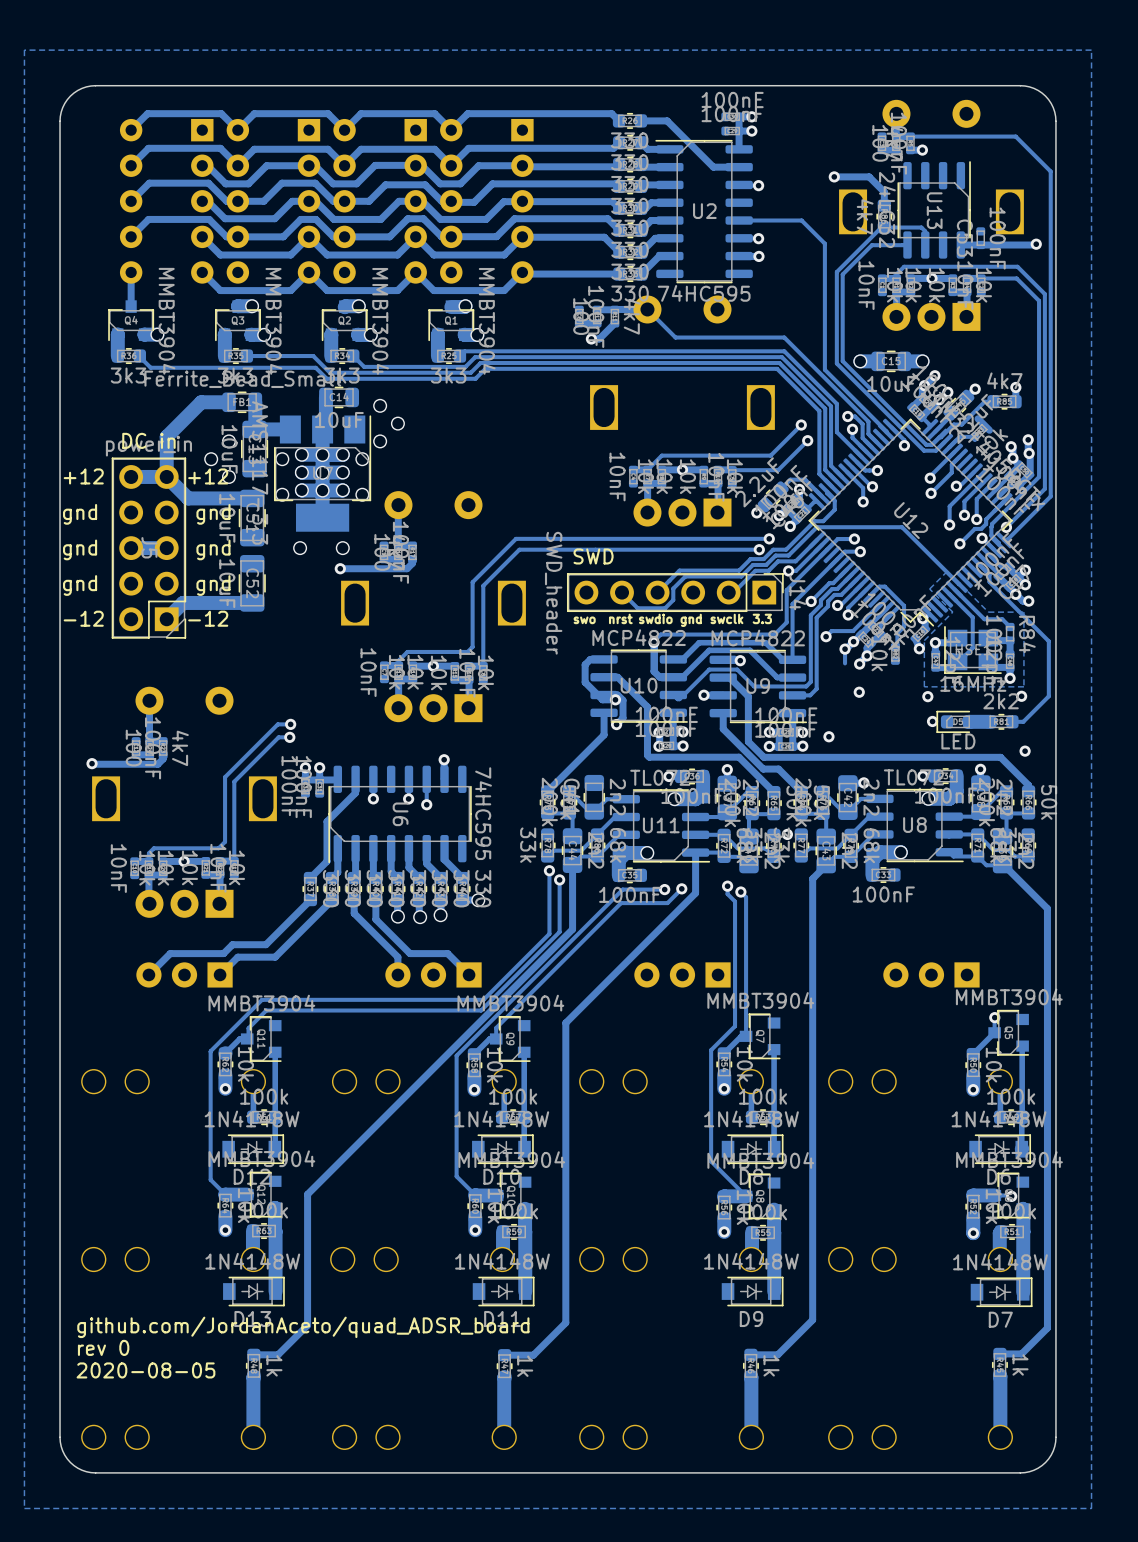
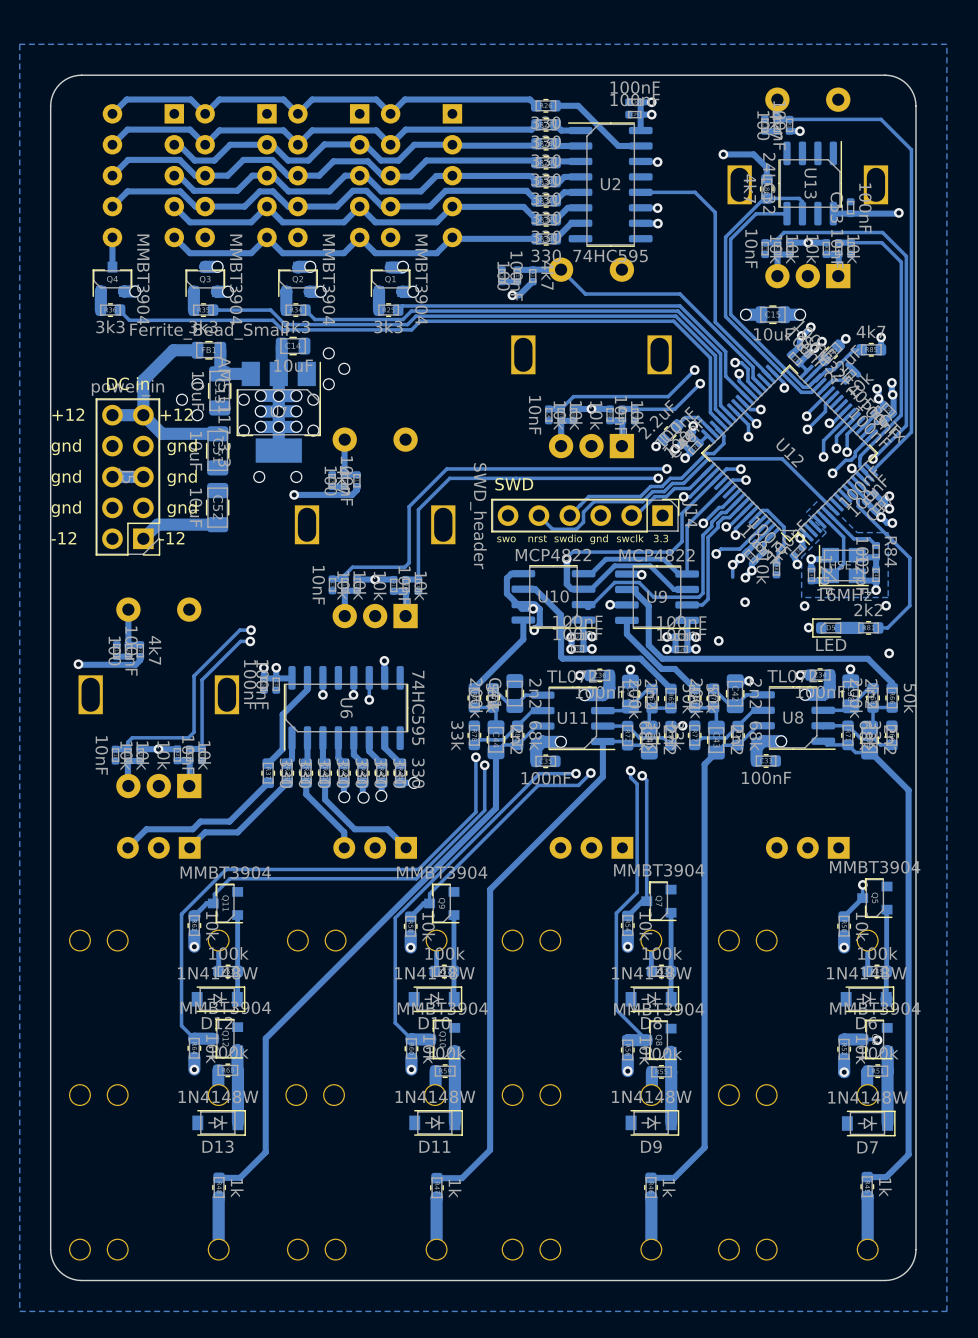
text: github.com/JordanAceto/quad_ADSR_board (303, 1327) -> none
text: rev 0 (103, 1347) -> none
text: 2020-08-05 (145, 1370) -> none

